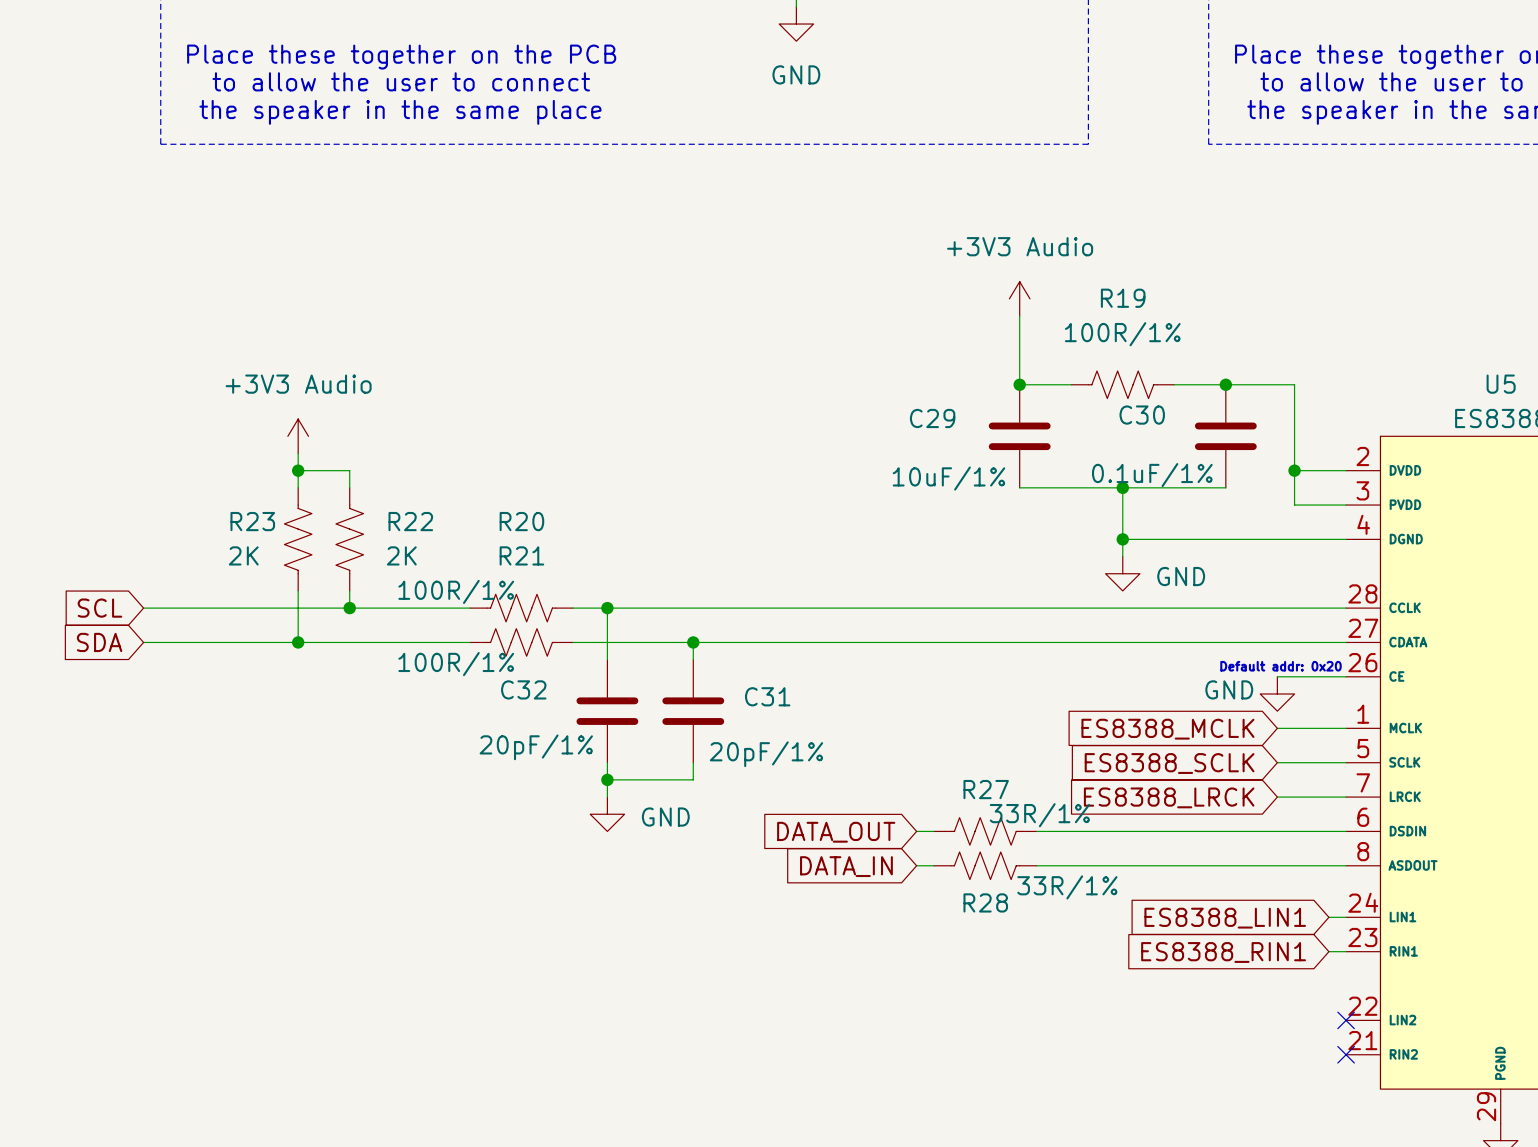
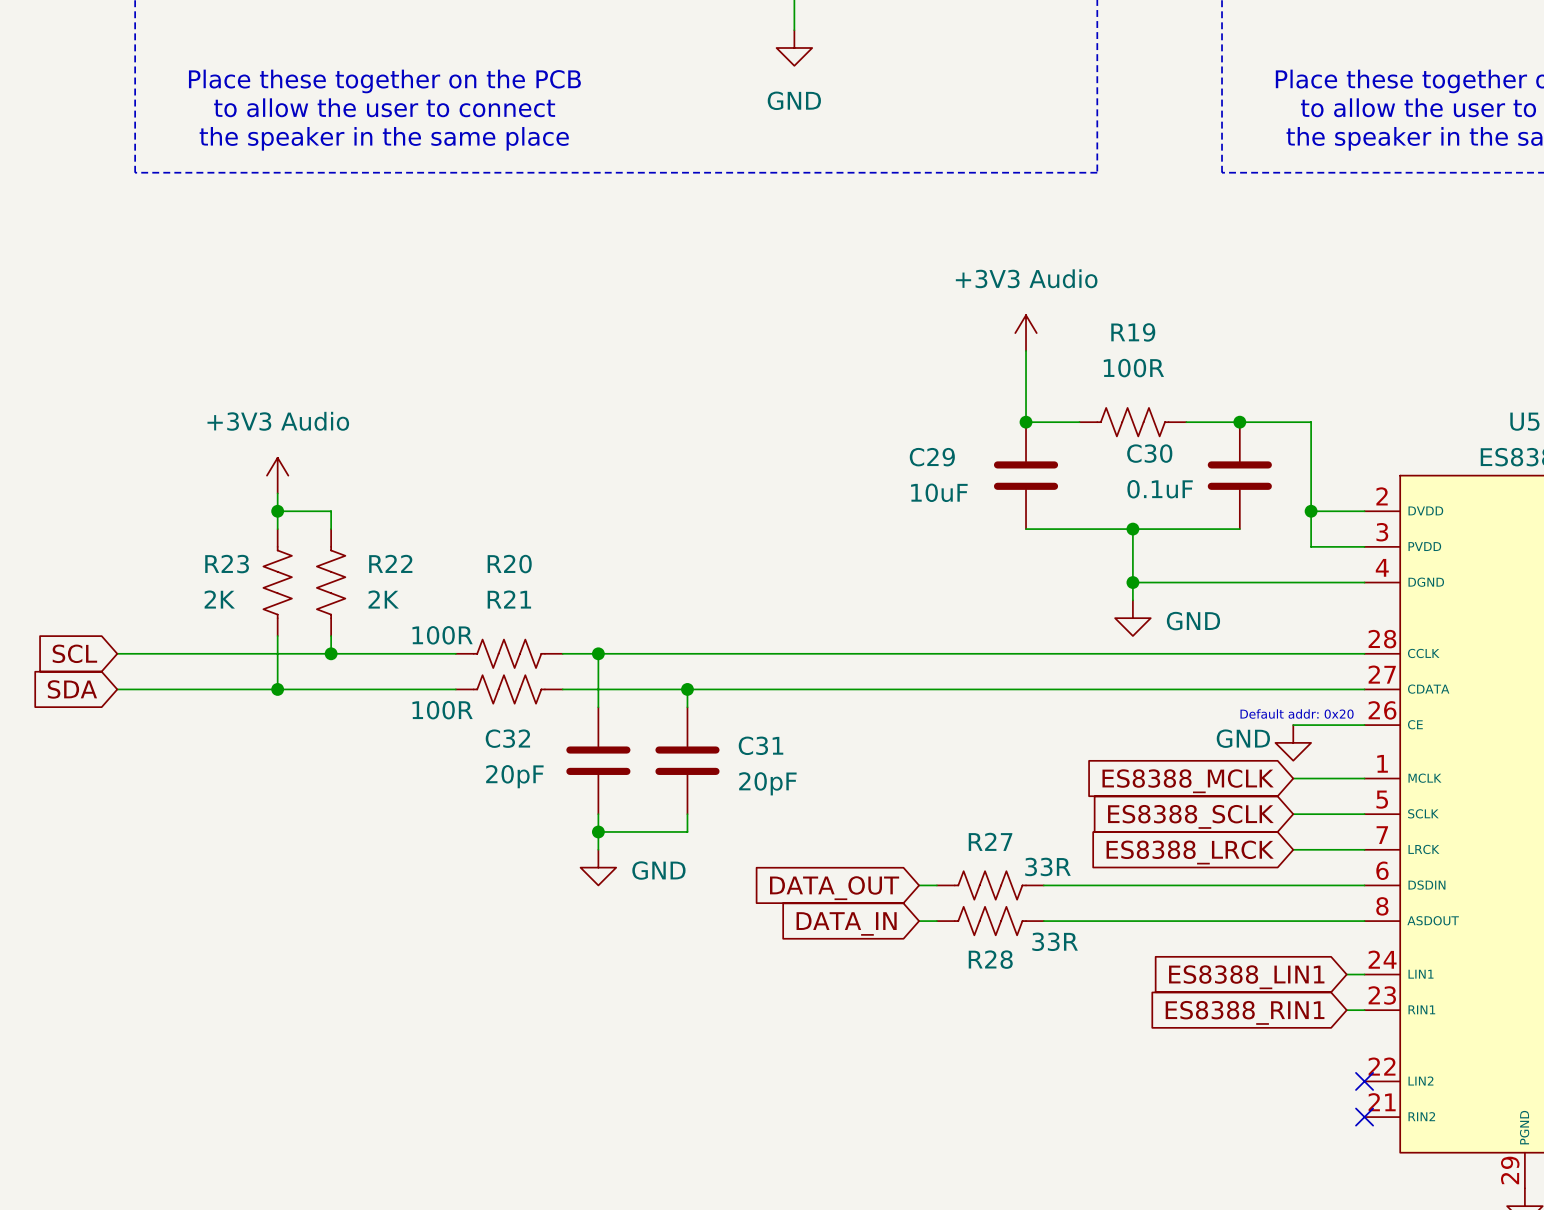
R19 value: 100R/1% (1122, 334) -> 100R (1133, 368)
C30 value: 0.1uF/1% (1152, 475) -> 0.1uF (1160, 489)
C29 value: 10uF/1% (948, 478) -> 10uF (939, 492)
R20 value: 100R/1% (456, 591) -> 100R (442, 635)
R21 value: 100R/1% (456, 664) -> 100R (442, 710)
C32 value: 20pF/1% (536, 747) -> 20pF (514, 776)
C31 value: 20pF/1% (766, 754) -> 20pF (767, 783)
R27 value: 33R/1% (1039, 815) -> 33R (1047, 866)
R28 value: 33R/1% (1067, 887) -> 33R (1055, 941)

